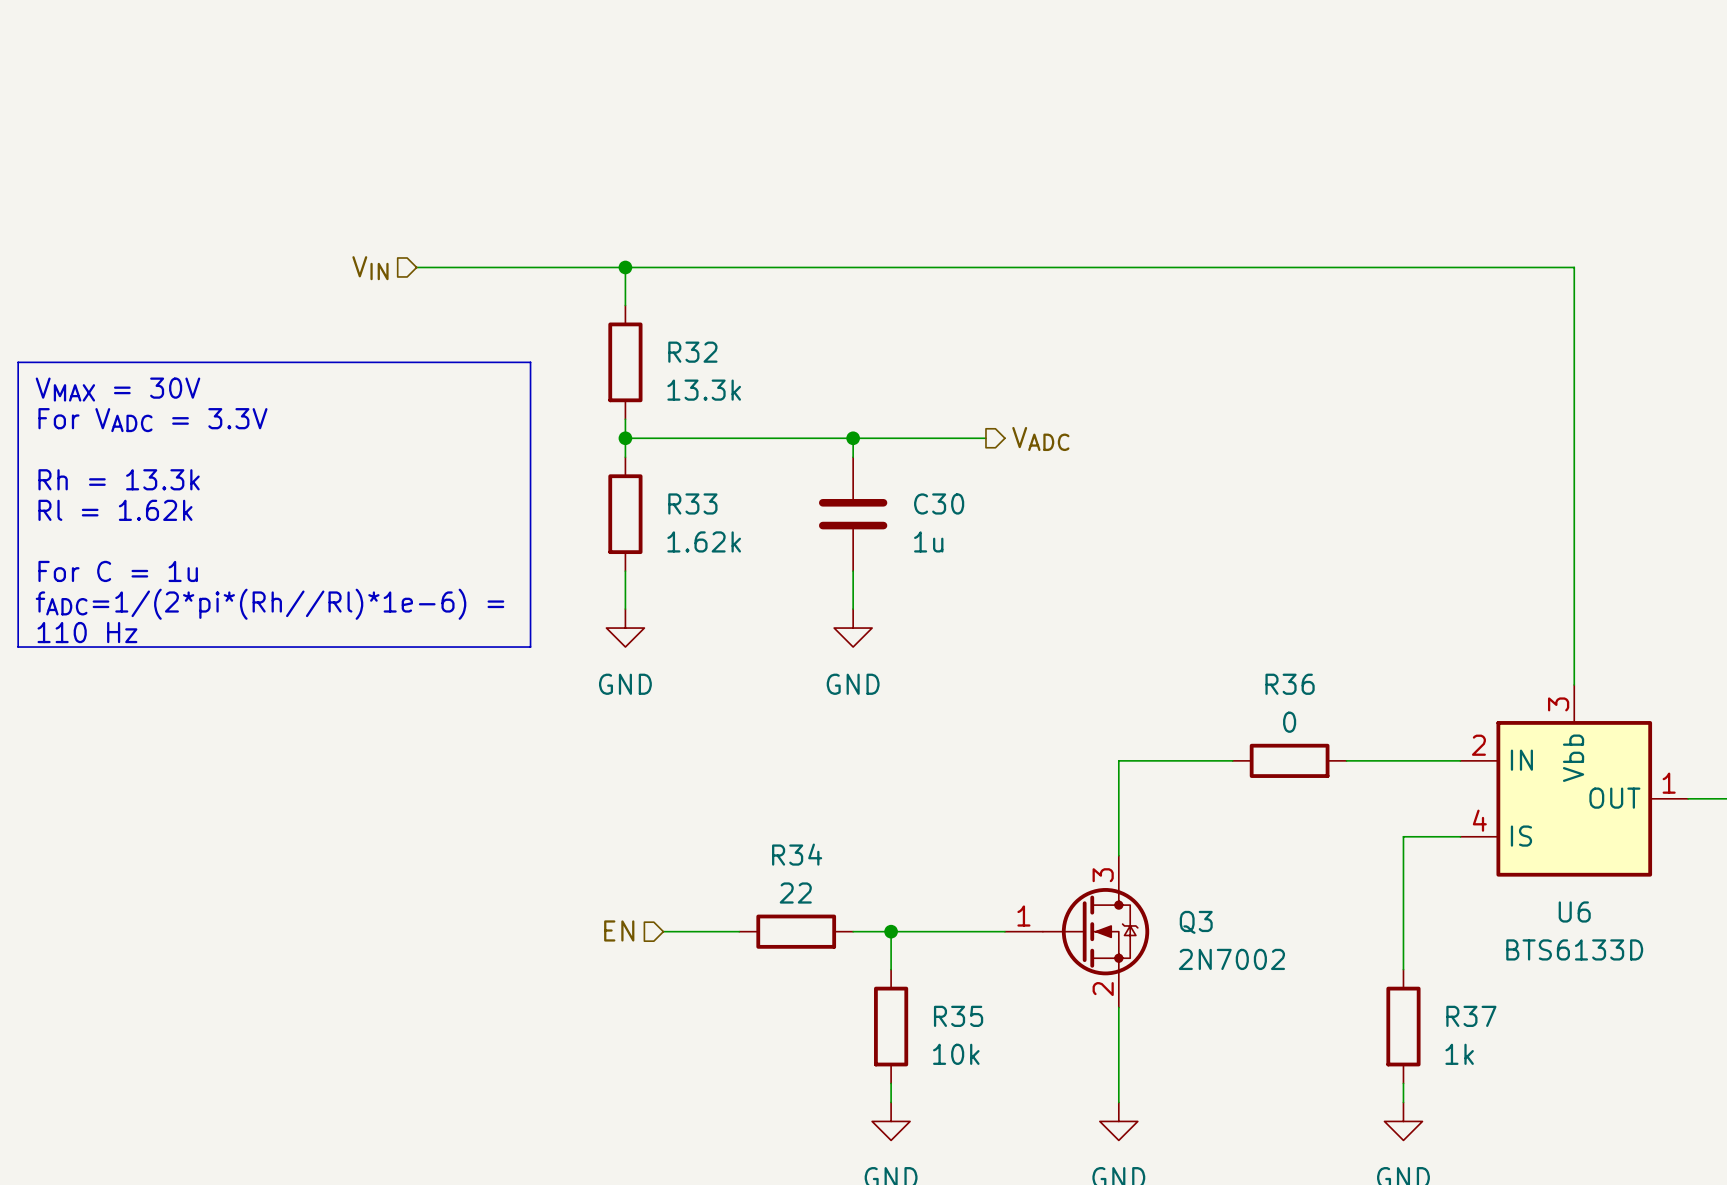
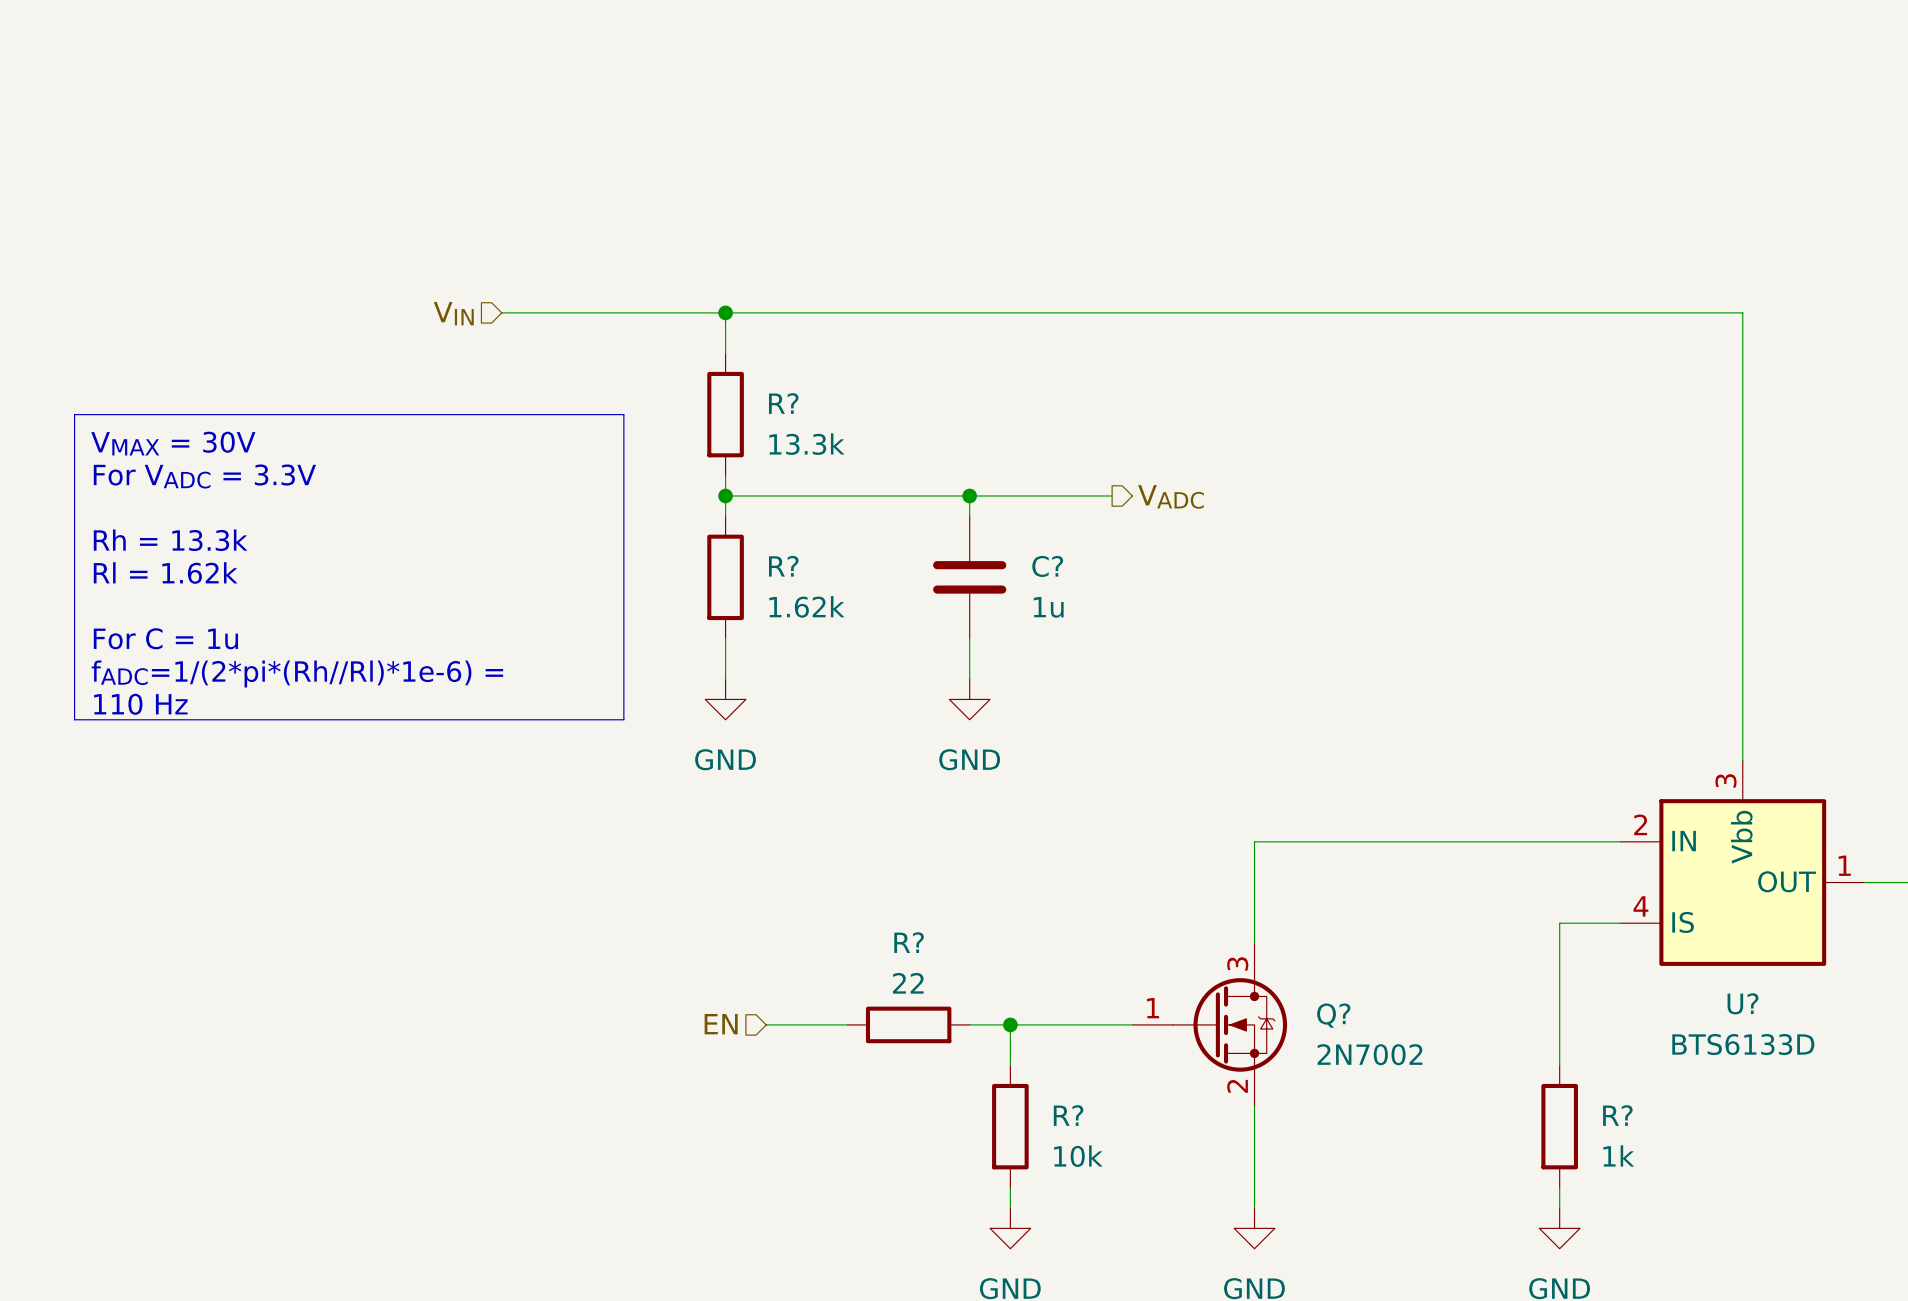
R32 name: R32 (692, 352) -> R? (783, 403)
R33 name: R33 (692, 503) -> R? (783, 566)
C30 name: C30 (939, 503) -> C? (1047, 566)
wire: none -> (1376, 841) (1498, 841)
R36: 0 (1289, 760) -> none
R34 name: R34 (797, 854) -> R? (909, 942)
U6 name: U6 (1574, 911) -> U? (1743, 1003)
Q3 name: Q3 (1196, 922) -> Q? (1333, 1015)
R35 name: R35 (958, 1016) -> R? (1068, 1115)
R37 name: R37 (1471, 1016) -> R? (1617, 1115)

